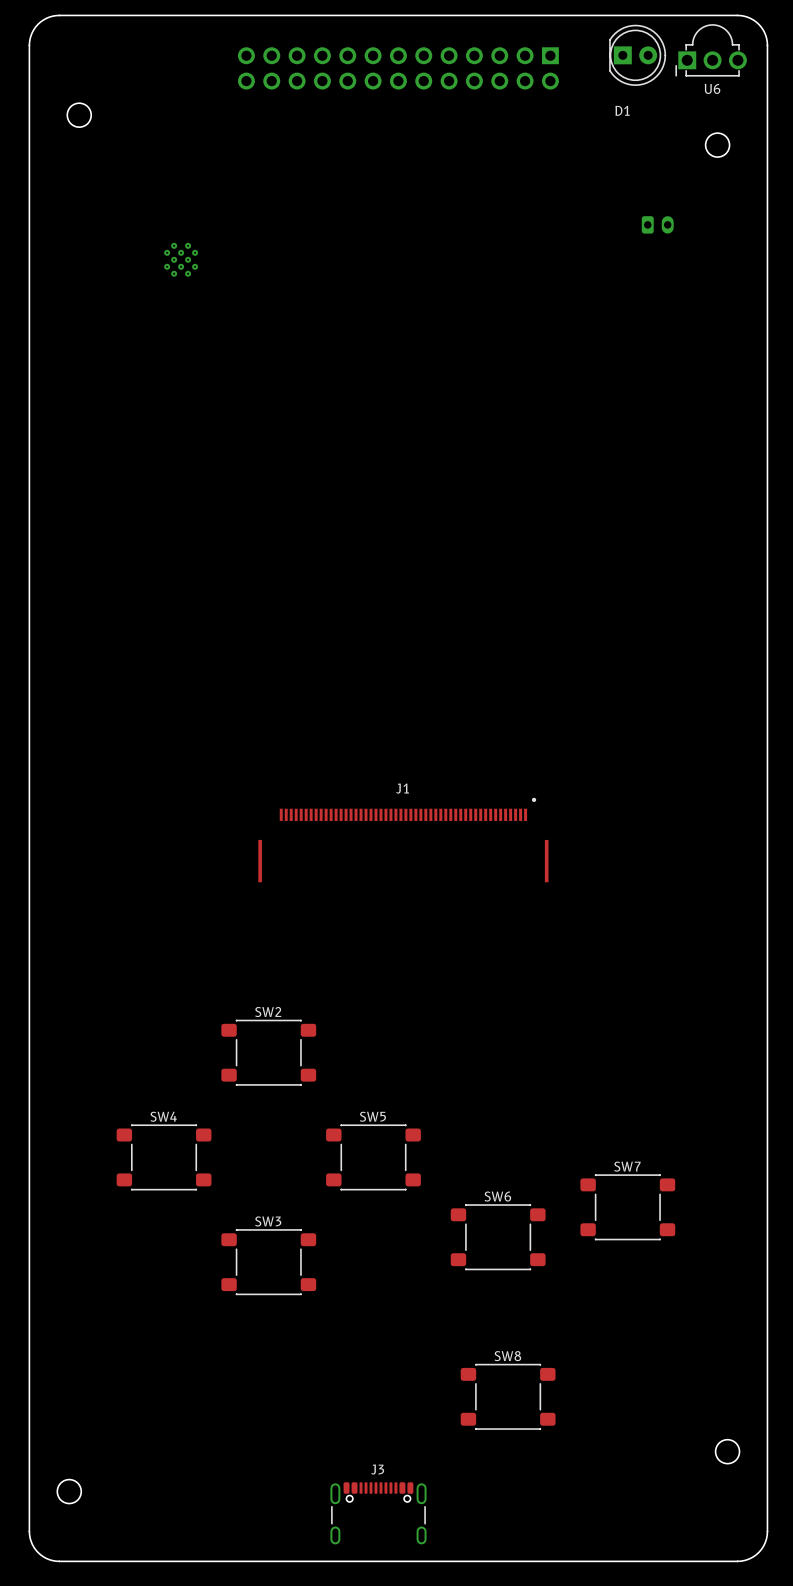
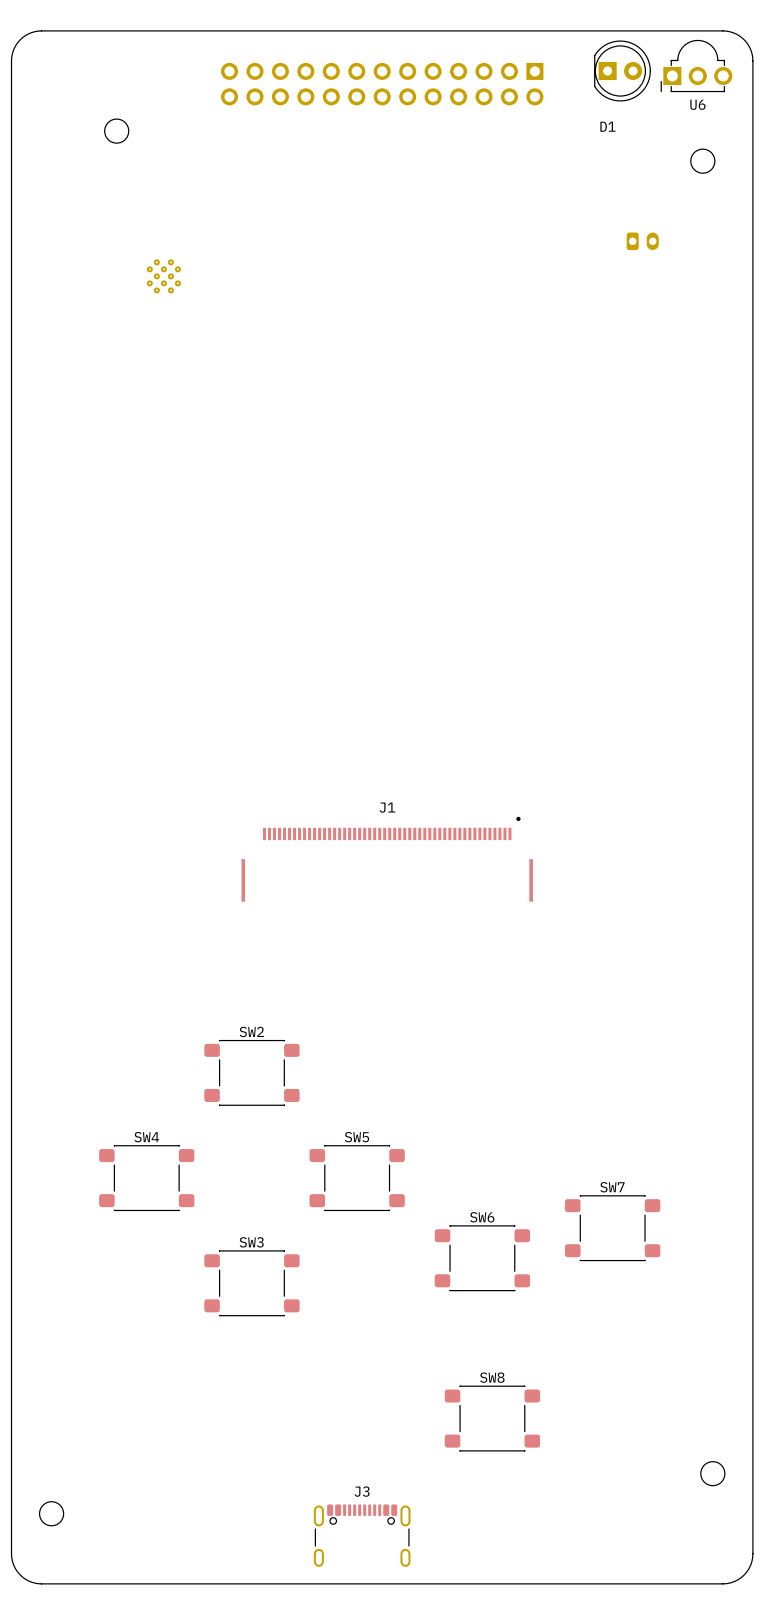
round board edge position: (79, 115) -> (116, 131)

